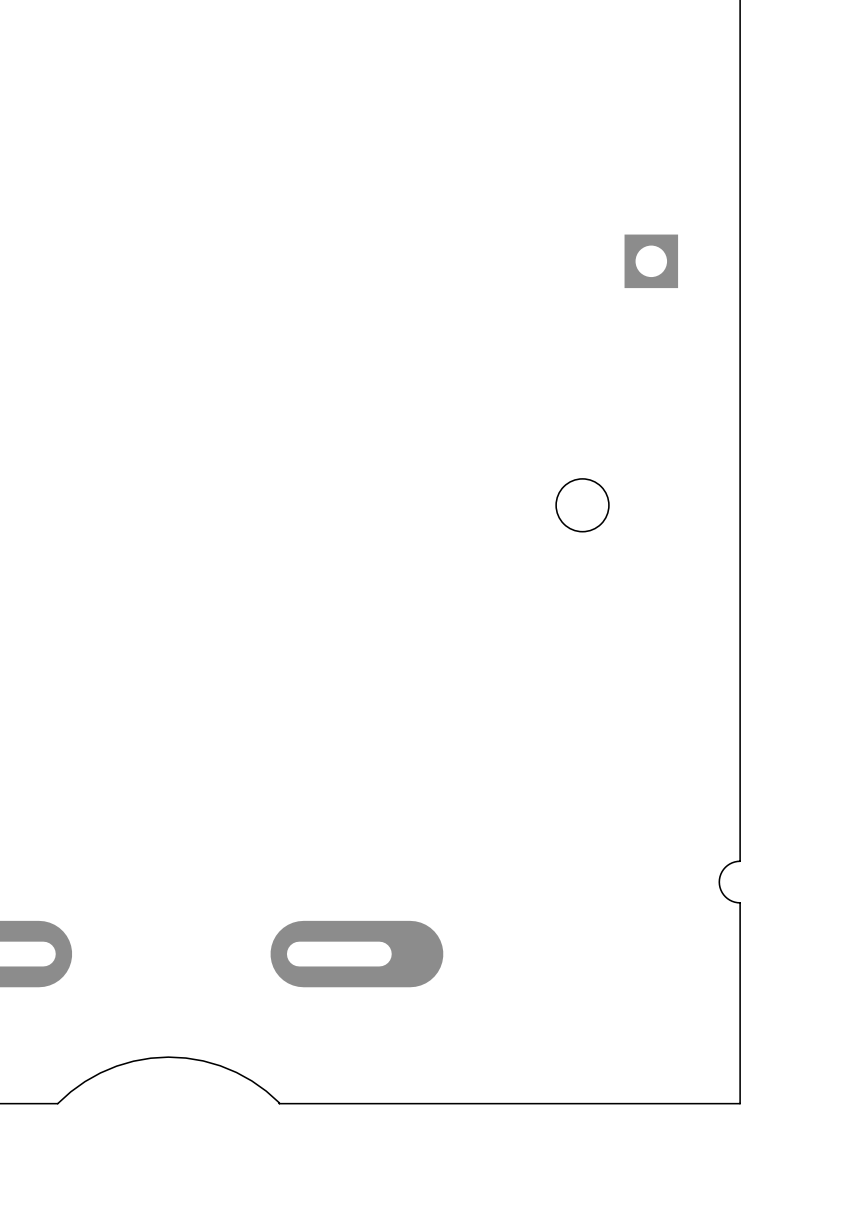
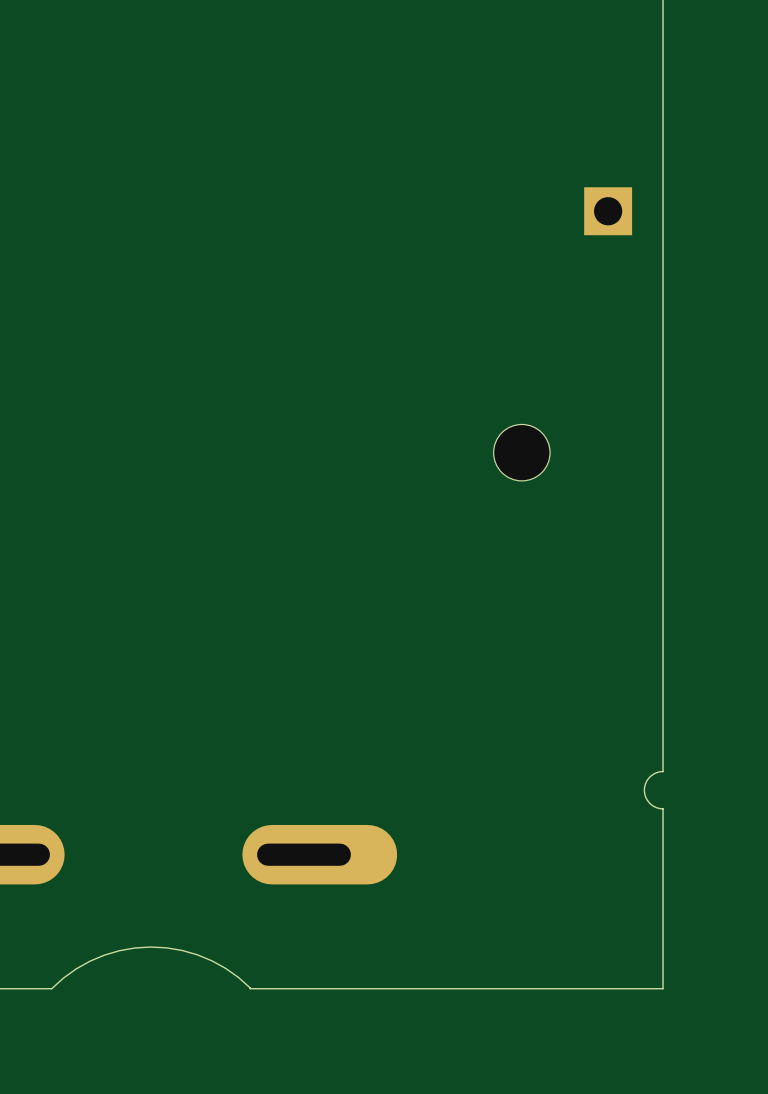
part position: (651, 261) -> (608, 211)
round board edge: [555, 478, 610, 533] -> none
part: none -> (521, 452)

